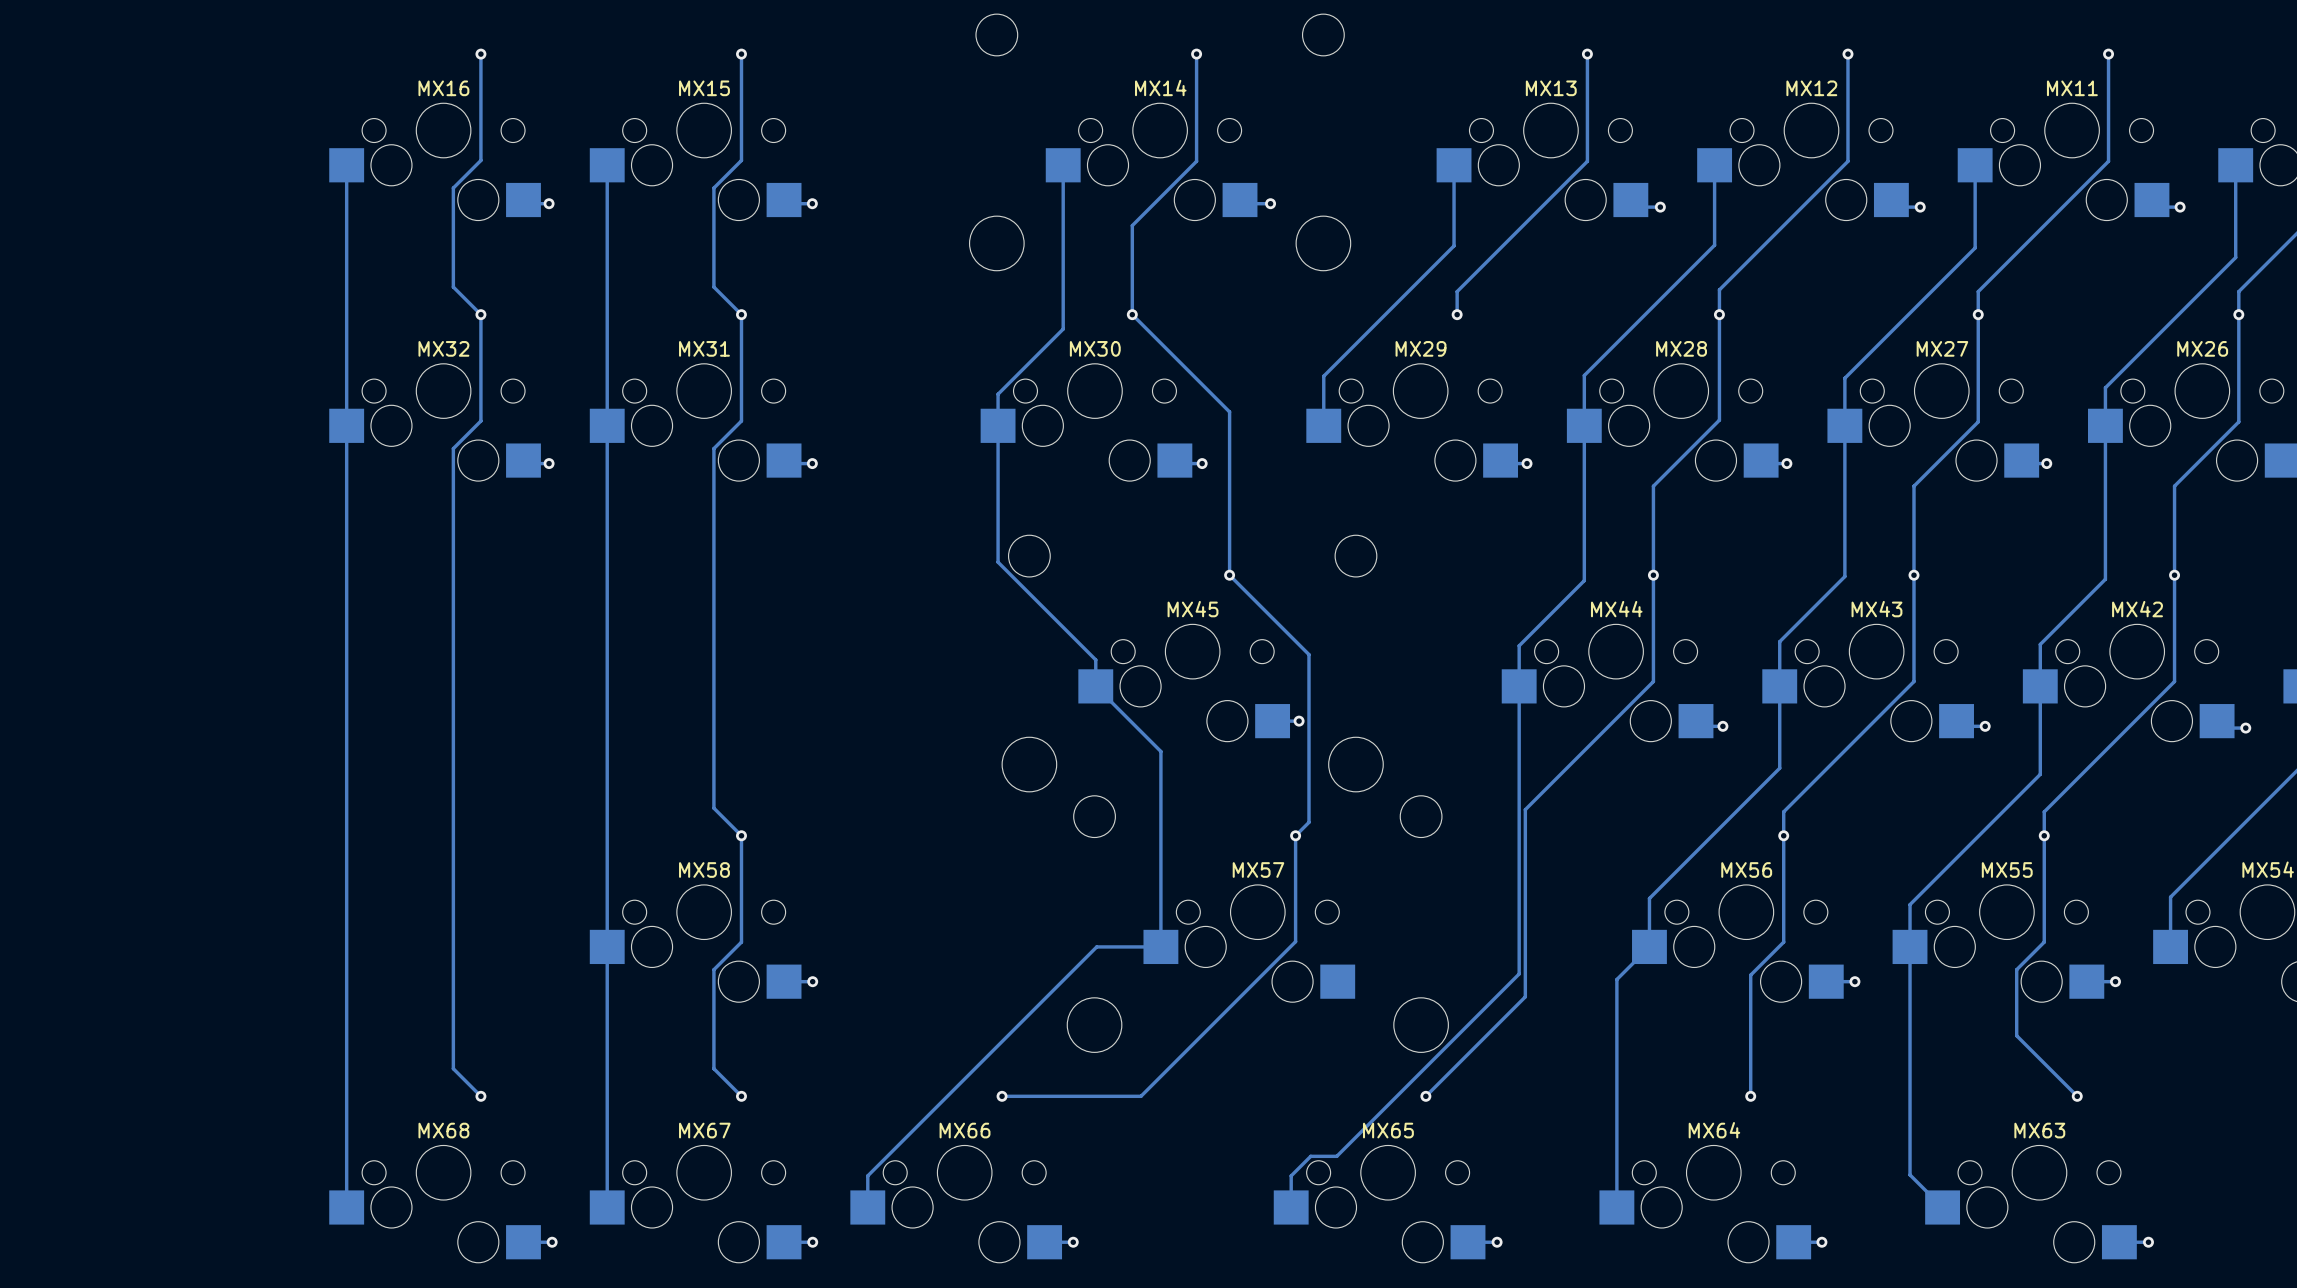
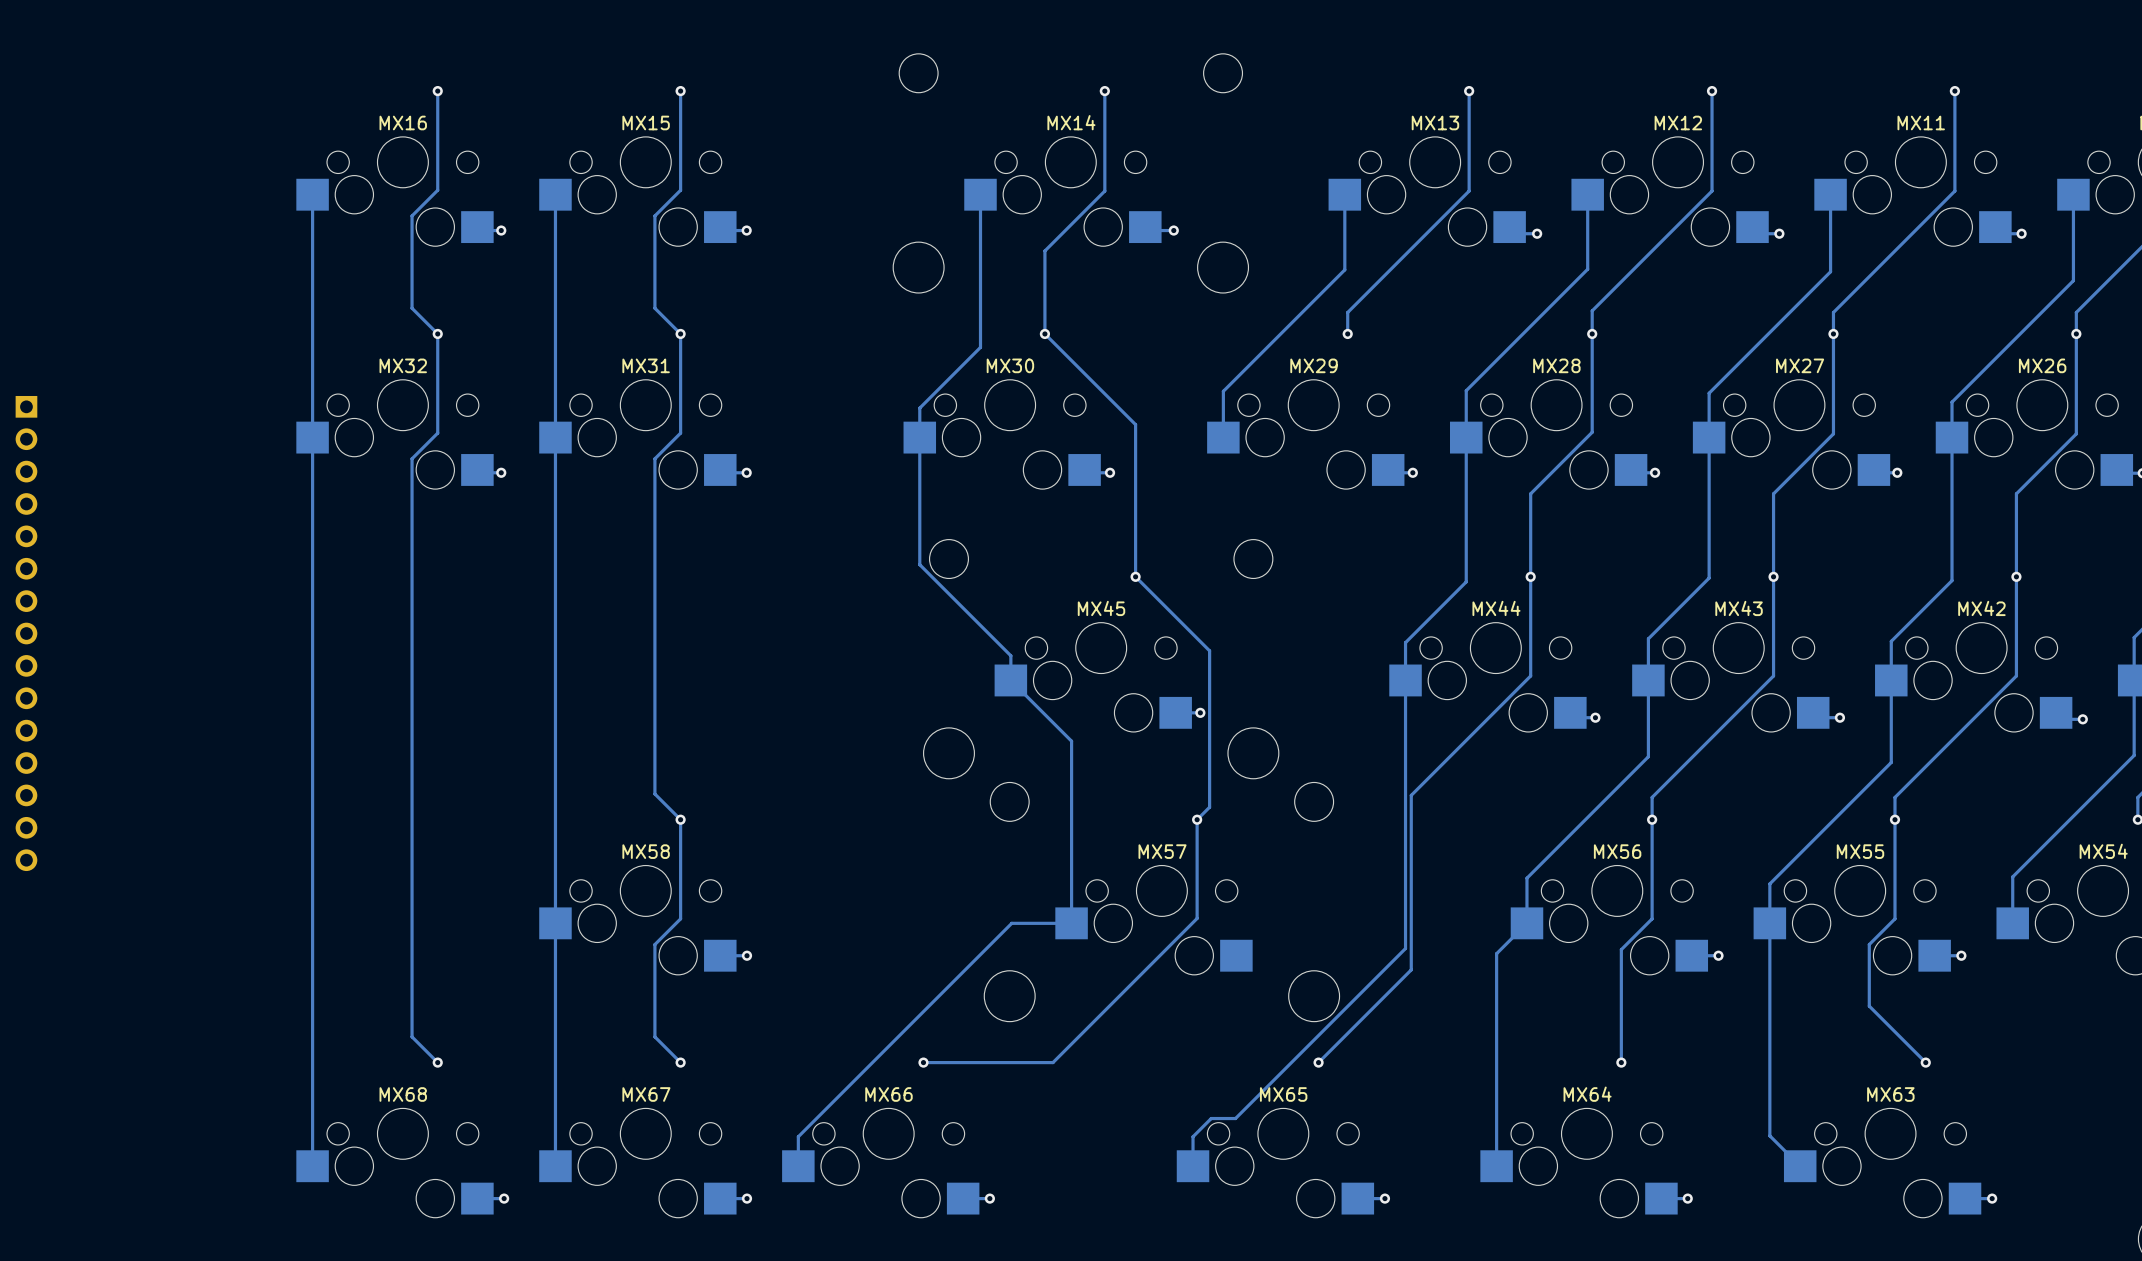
part: none -> (26, 633)

